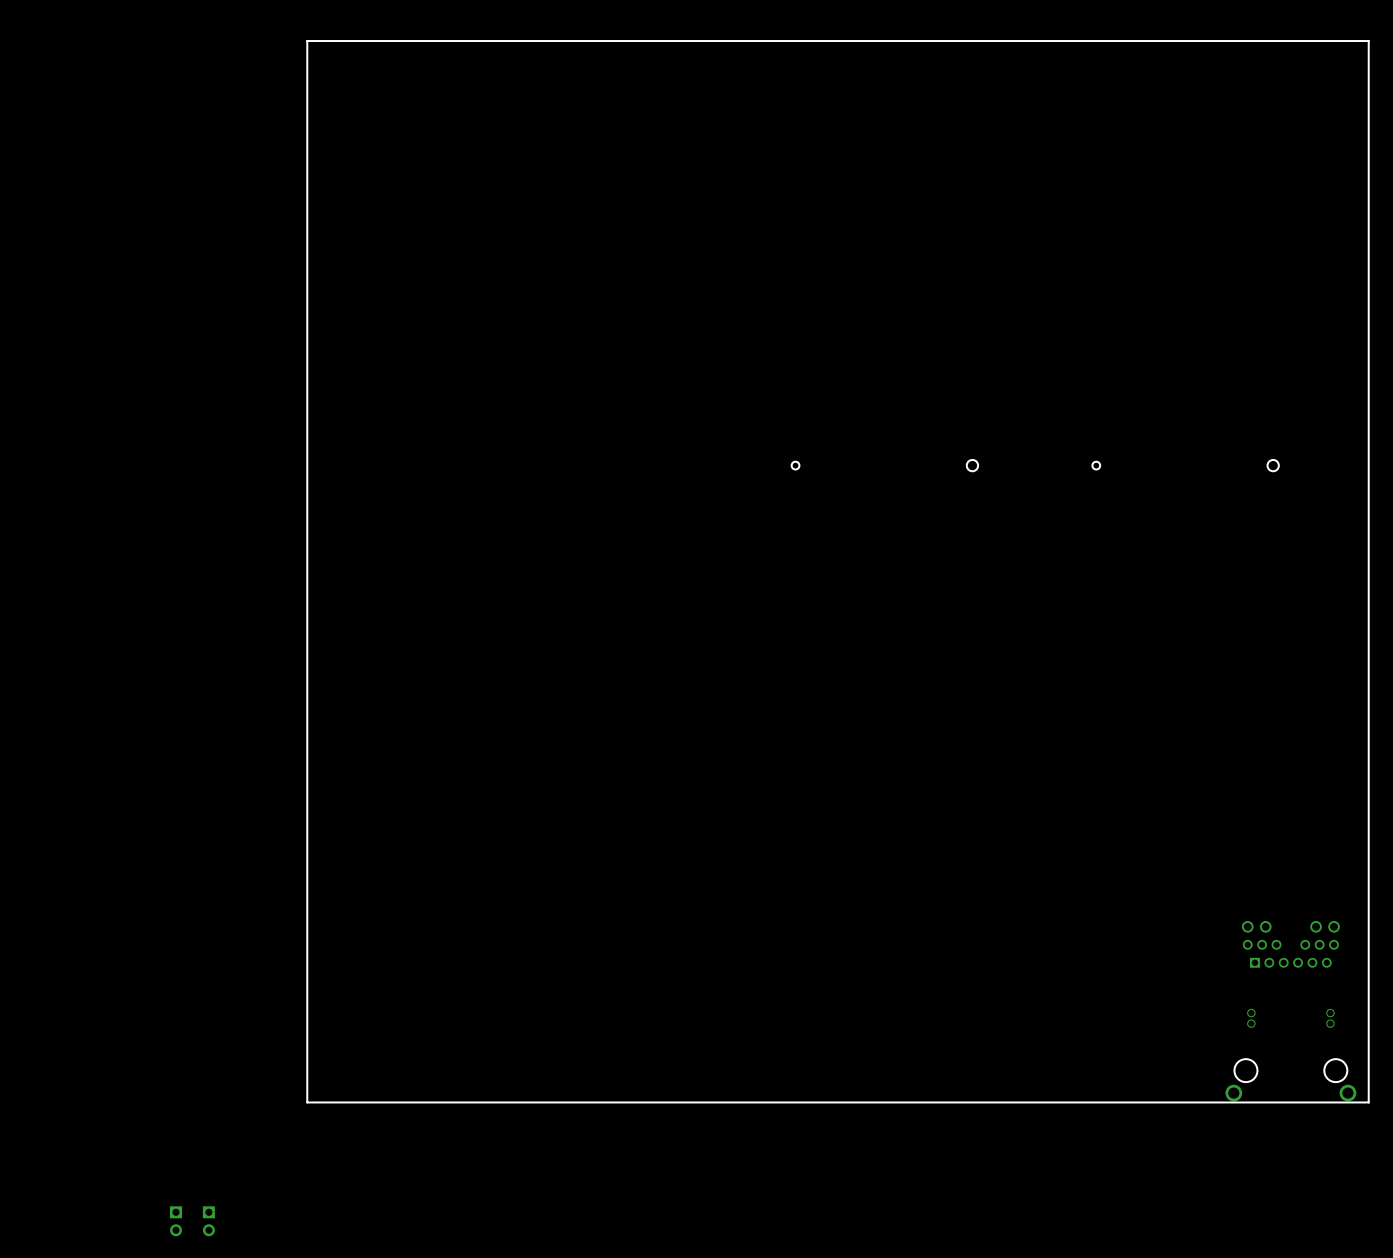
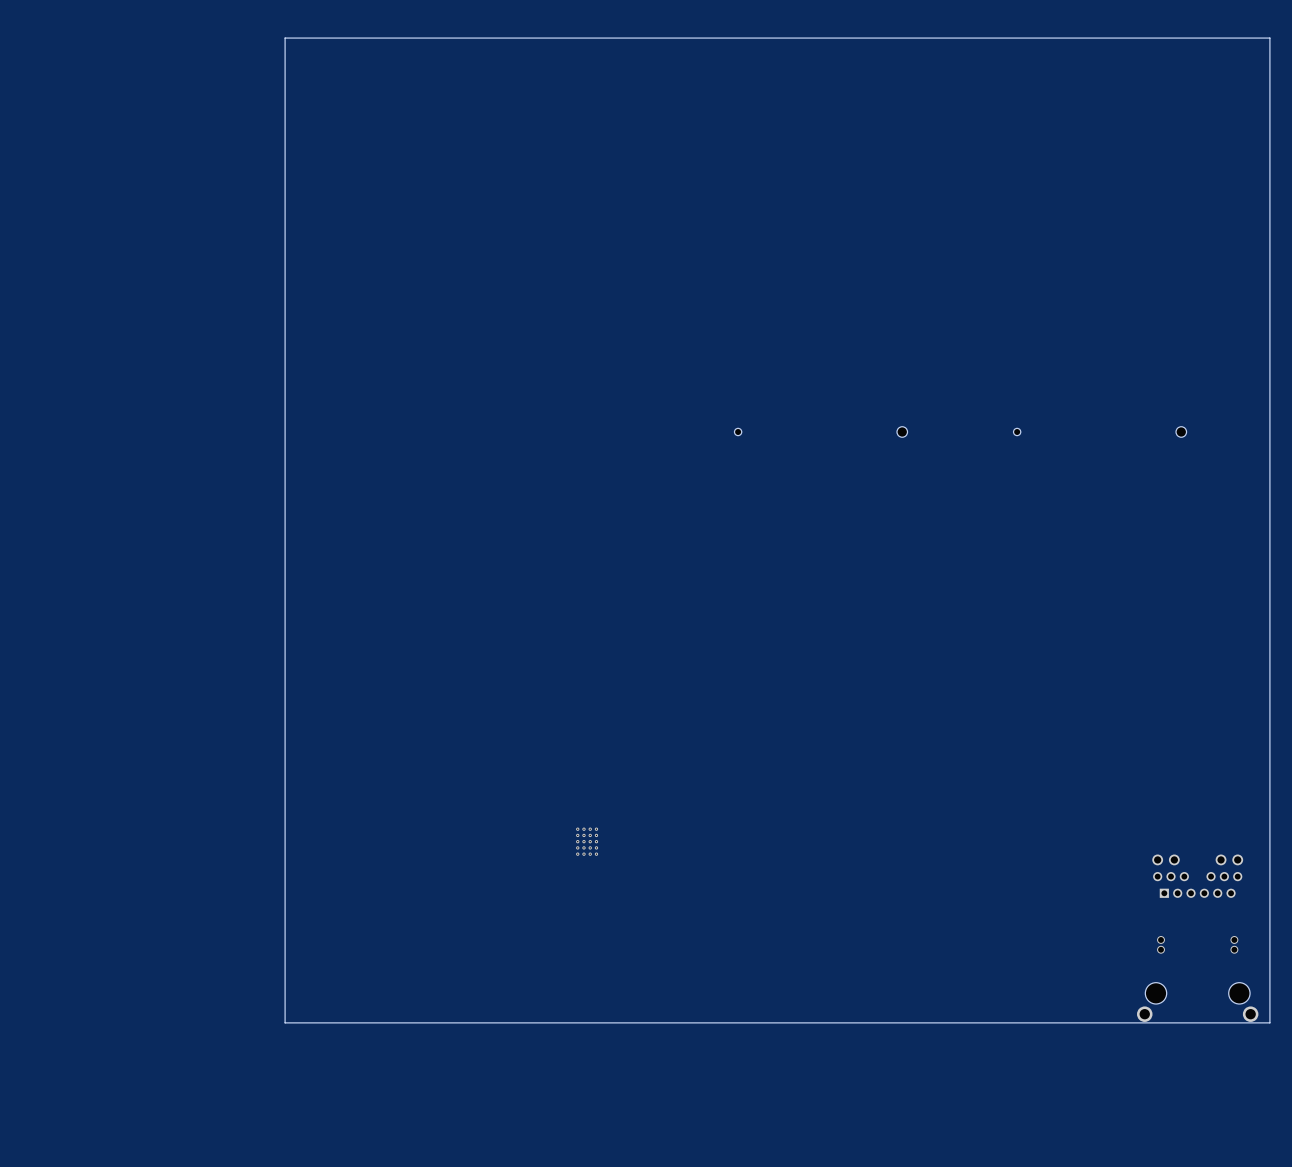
part: none -> (587, 841)
part: (176, 1221) -> none
part: (208, 1221) -> none

